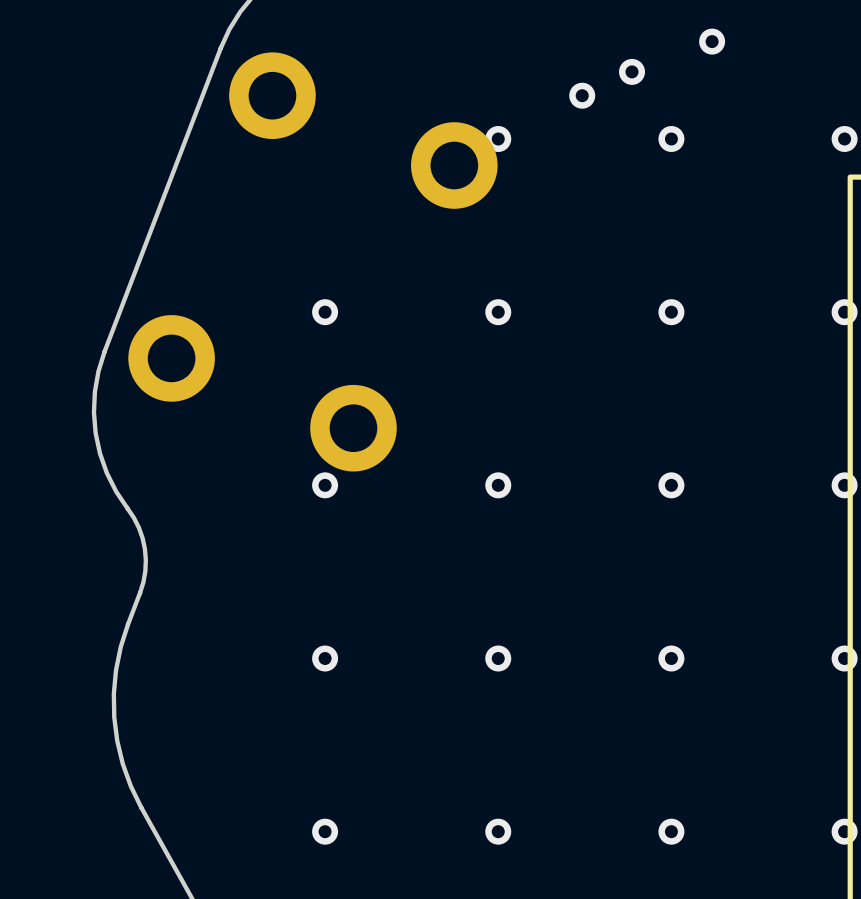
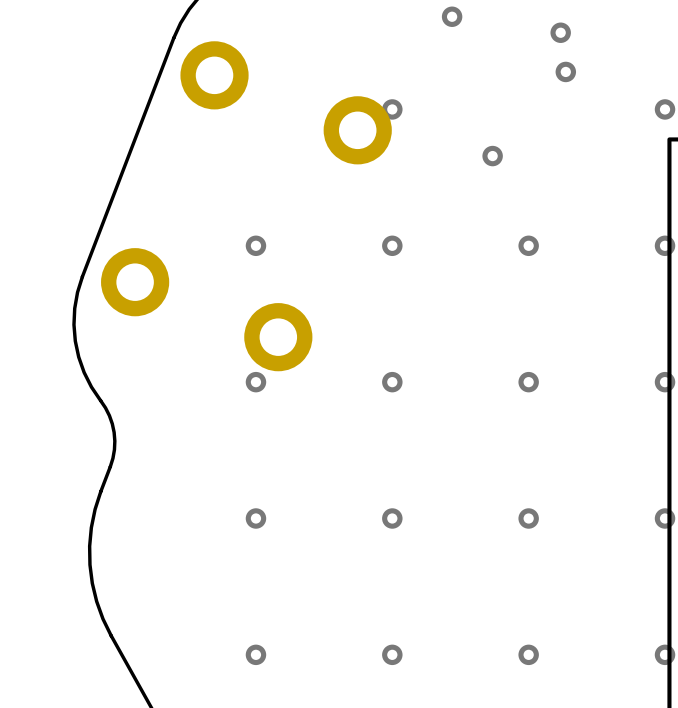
via: none -> (452, 16)
via: (632, 71) -> none
via: none -> (565, 71)
via: (582, 95) -> none
via: (671, 139) -> none
via: none -> (492, 156)

